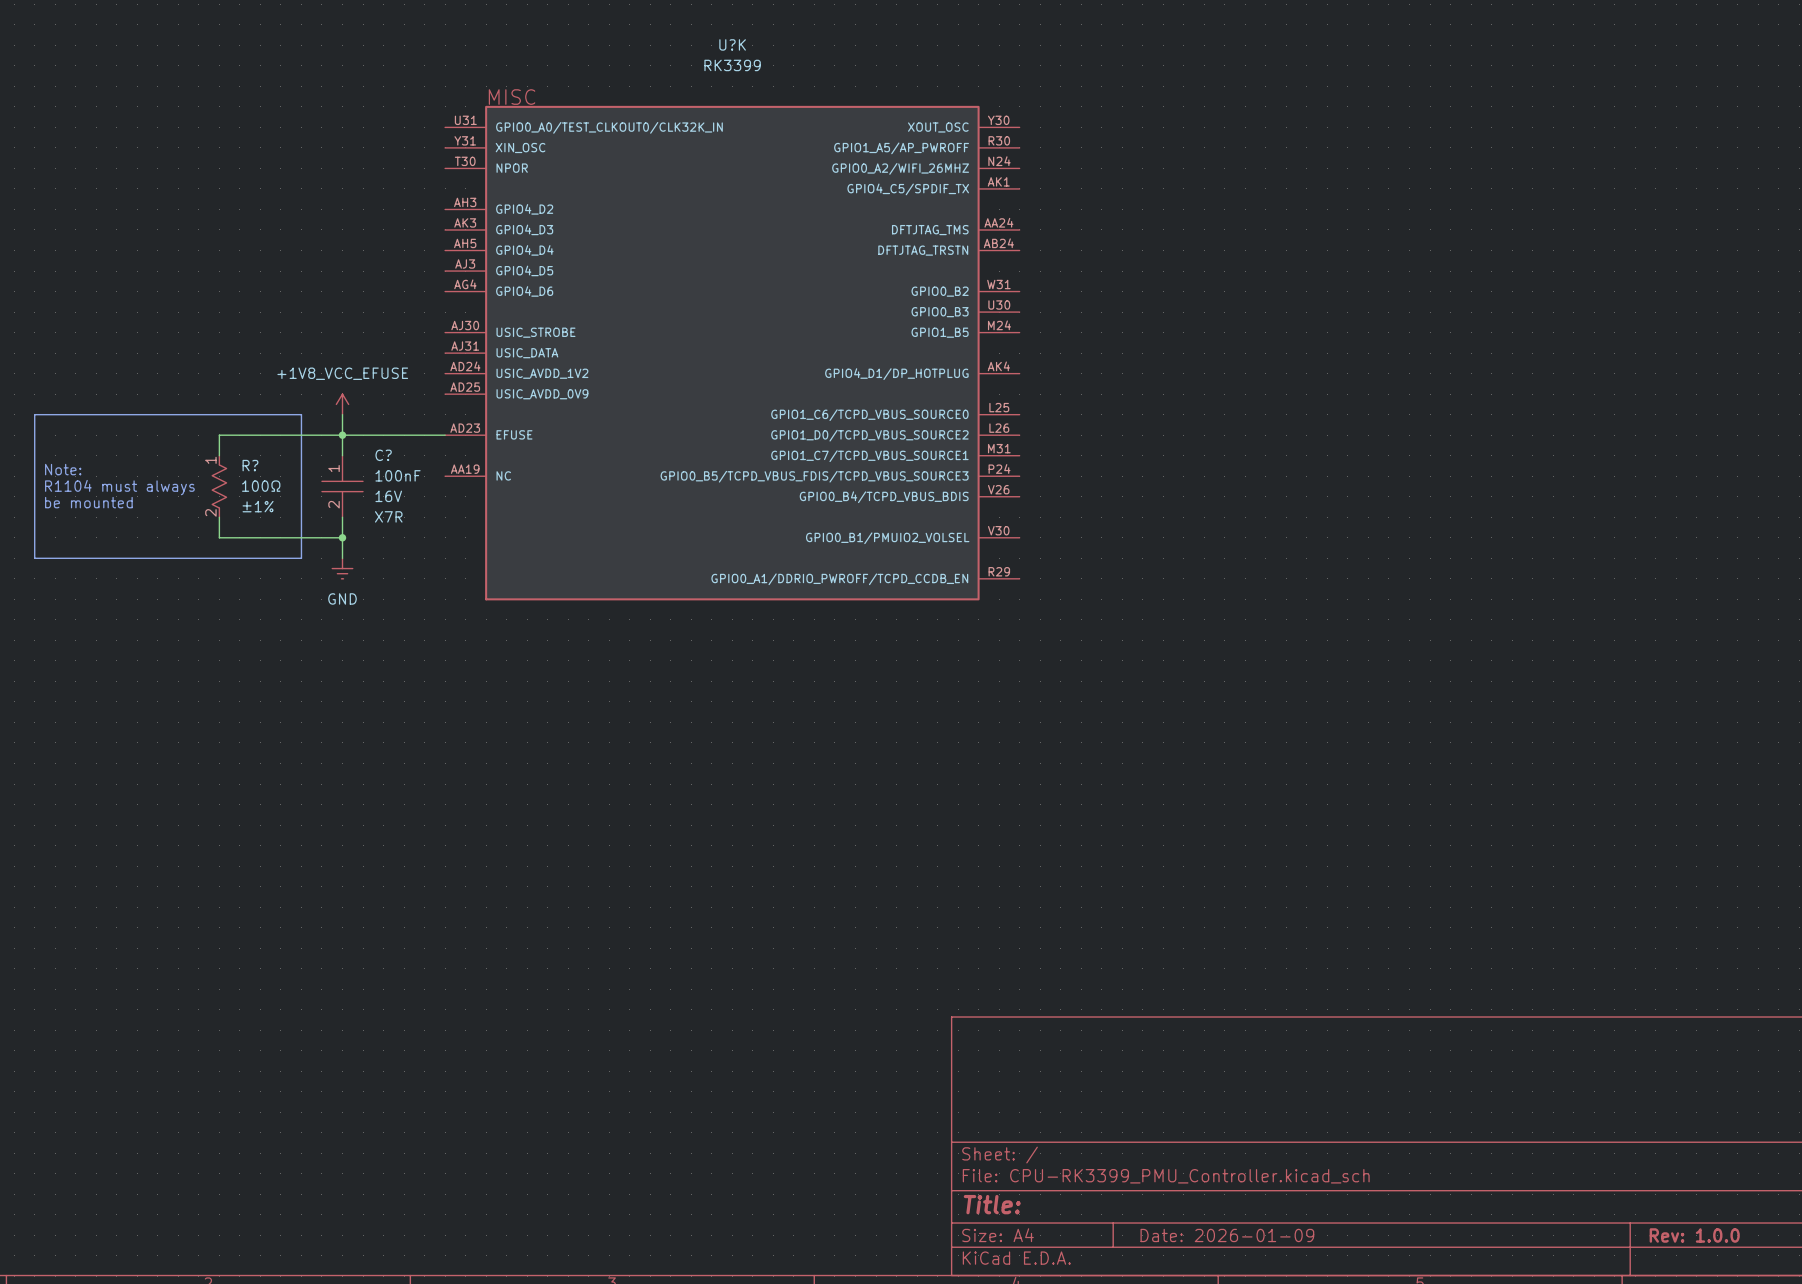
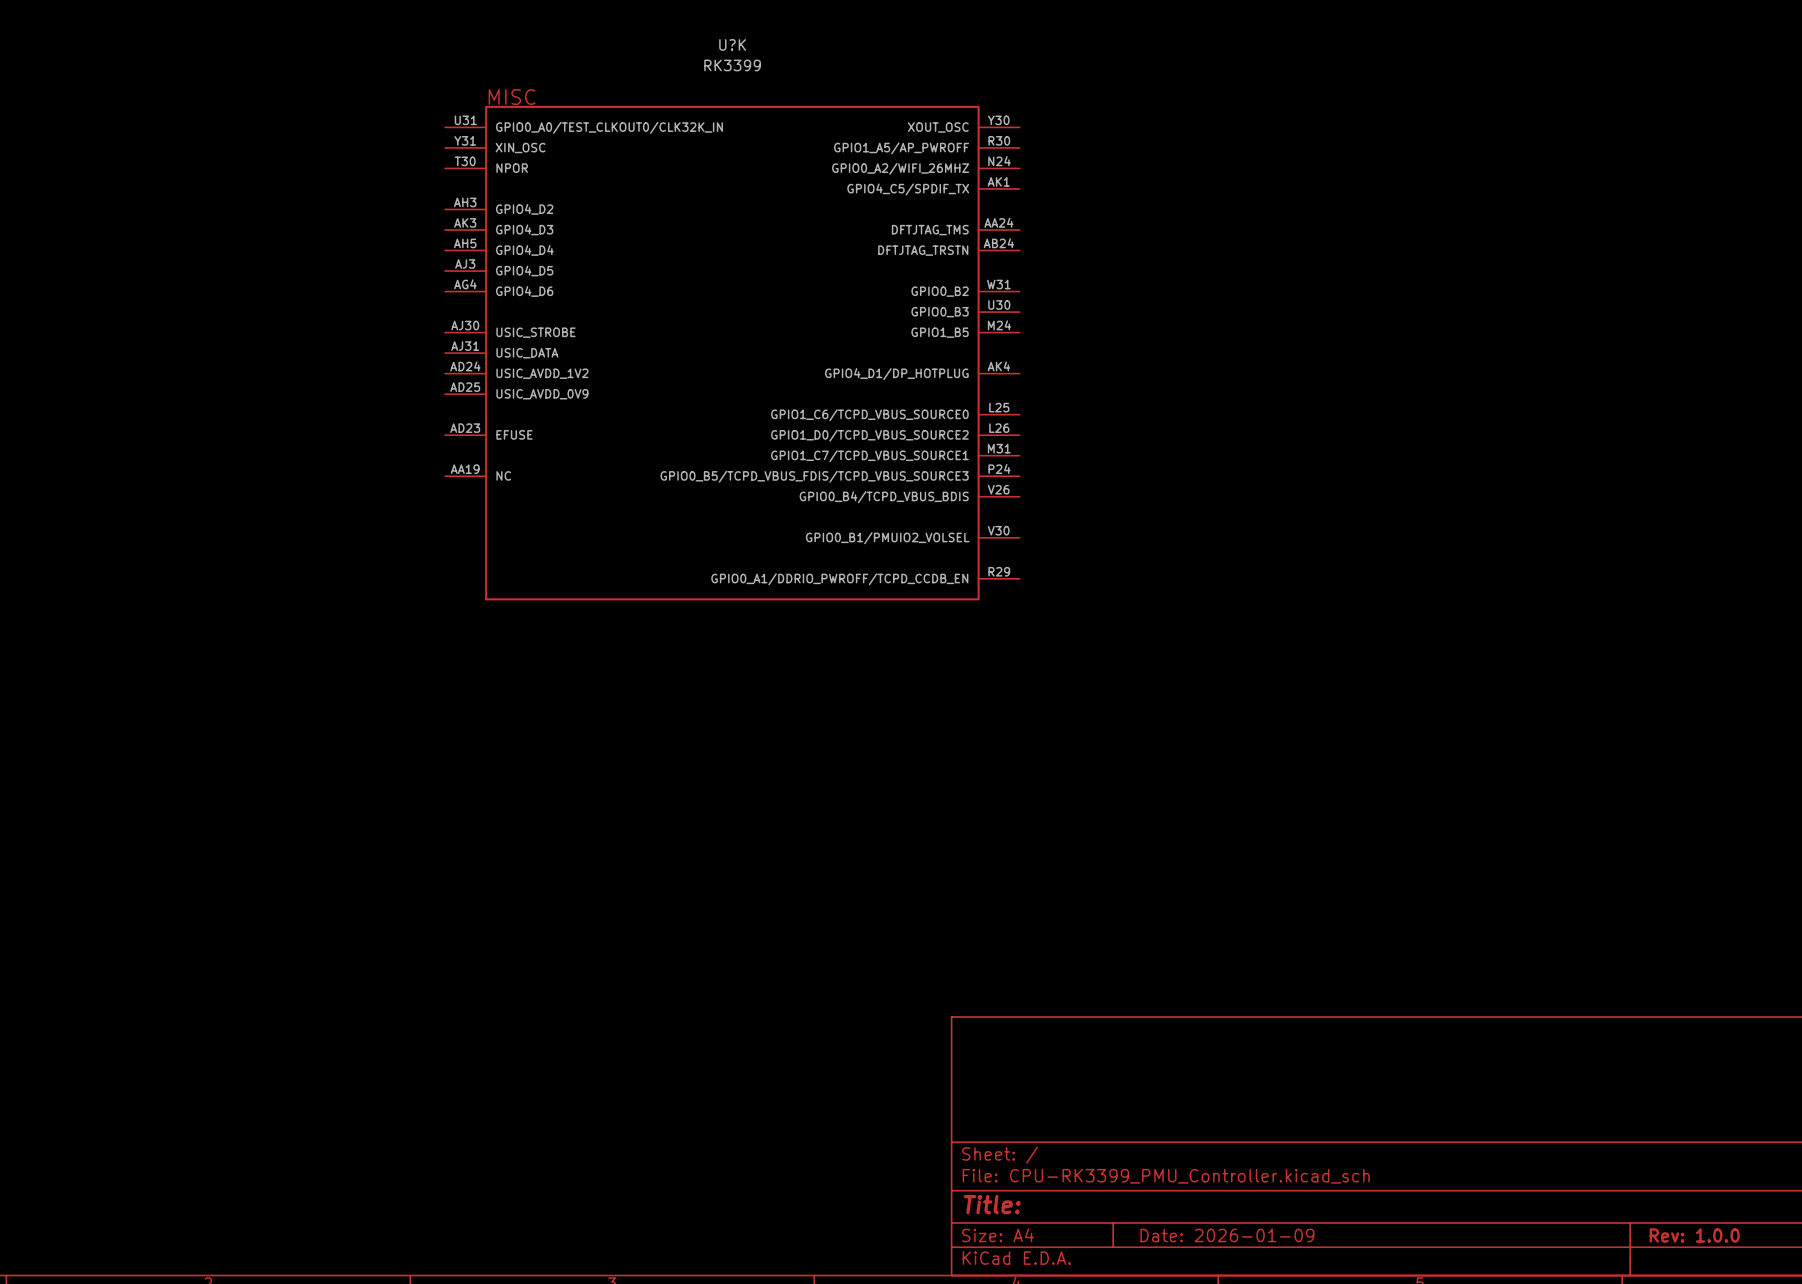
power symbol: +1V8_VCC_EFUSE (342, 404) -> none
line: (34, 414) (301, 414) (301, 558) (34, 558) (34, 414) -> none
wire: (342, 414) (342, 455) -> none
junction: (342, 435) -> none
wire: (445, 435) (219, 435) (219, 455) -> none
text: Note: (63, 469) -> none
R?: (219, 486) -> none
C?: (342, 486) -> none
text: R1104 must always (119, 487) -> none
text: be mounted (88, 502) -> none
wire: (219, 517) (219, 537) (342, 537) -> none
wire: (342, 517) (342, 558) -> none
junction: (342, 537) -> none
power symbol: GND (342, 568) -> none

